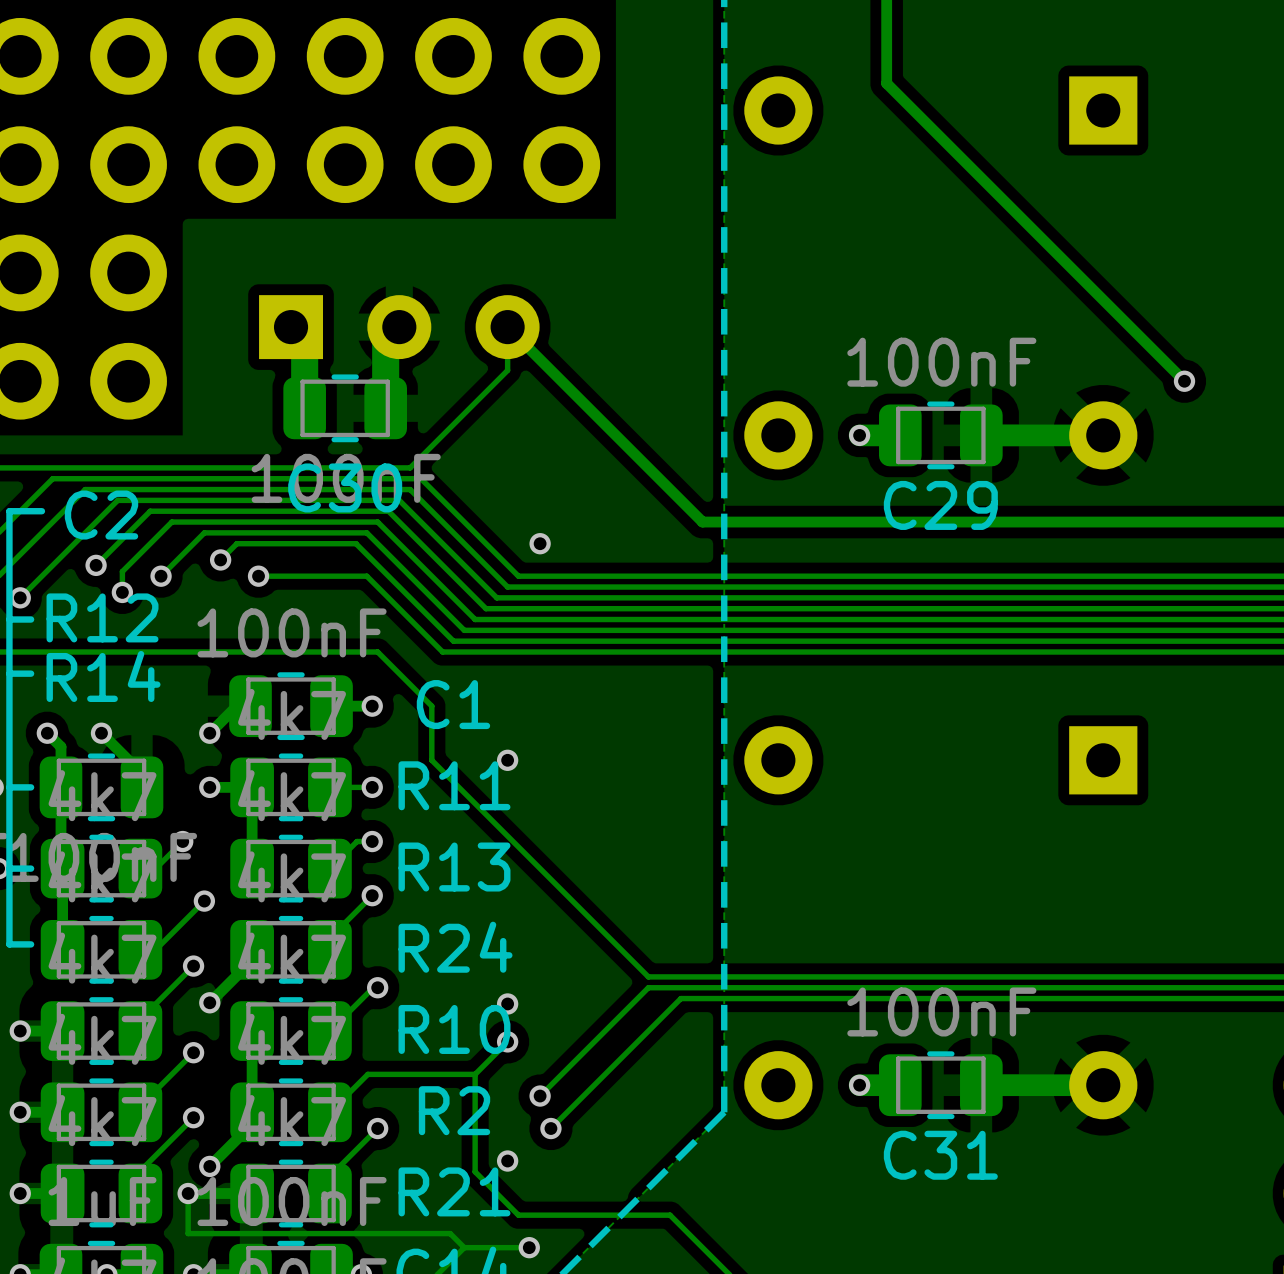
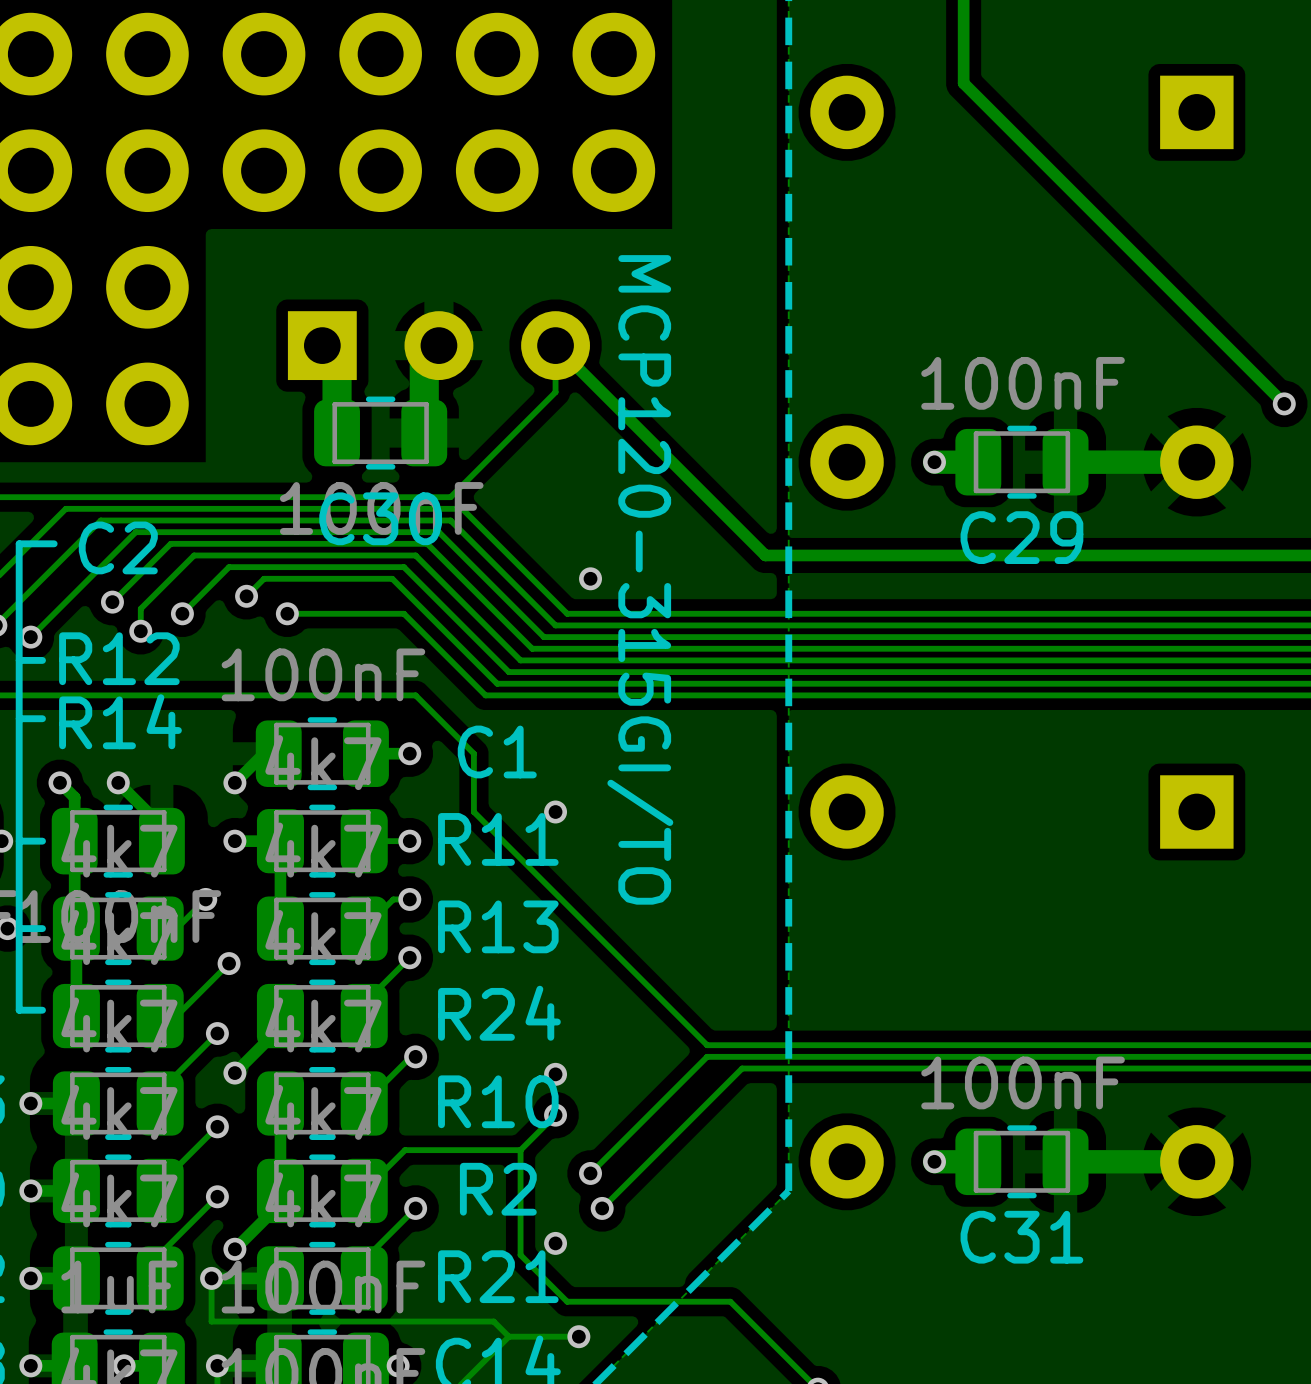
part value: none -> MCP120-315GI/TO (640, 579)

